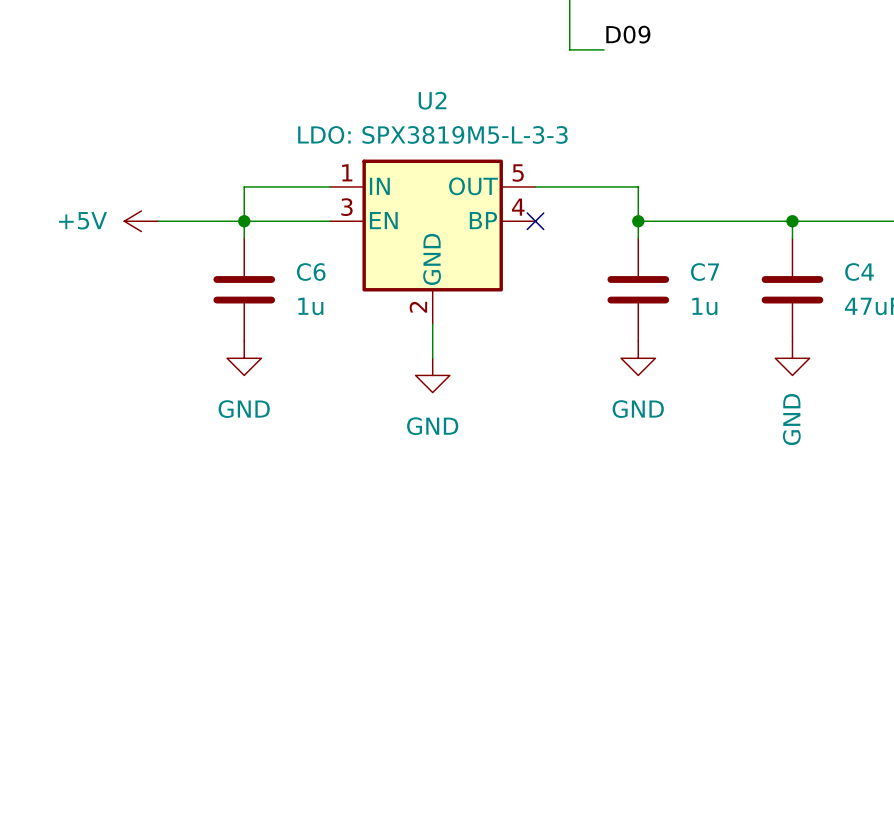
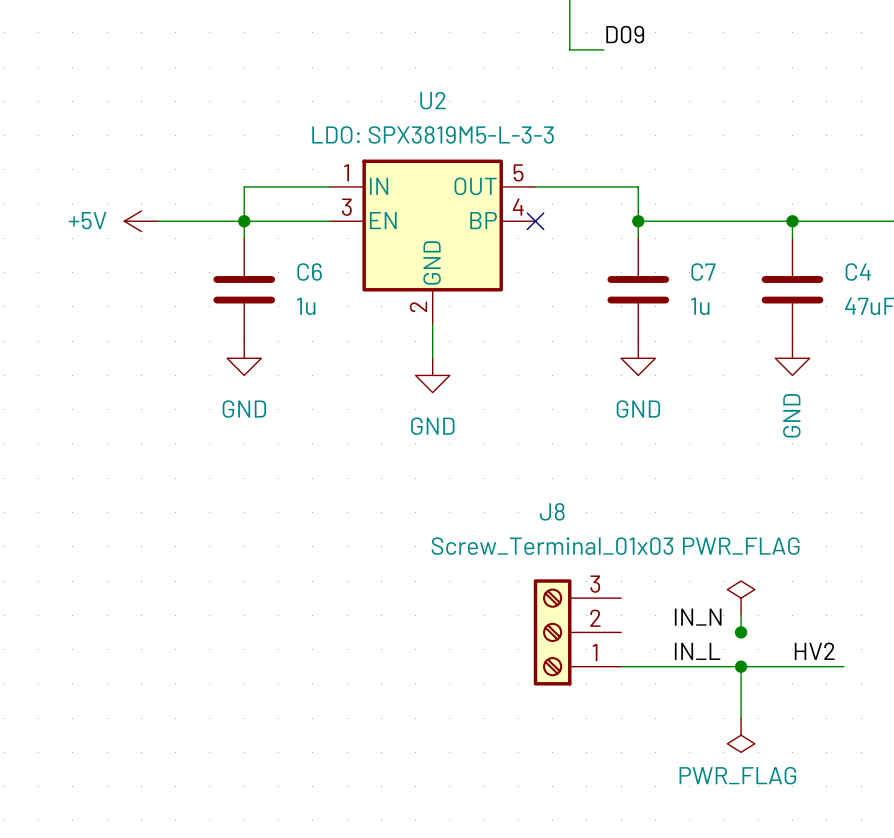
power symbol: none -> PWR_FLAG (741, 598)
wire: none -> (741, 615) (741, 632)
label: none -> IN_N (698, 617)
J8: none -> Screw_Terminal_01x03 (577, 632)
junction: none -> (741, 632)
label: none -> HV2 (814, 651)
label: none -> IN_L (697, 651)
wire: none -> (621, 666) (843, 666)
wire: none -> (741, 666) (741, 718)
junction: none -> (741, 666)
power symbol: none -> PWR_FLAG (741, 735)

